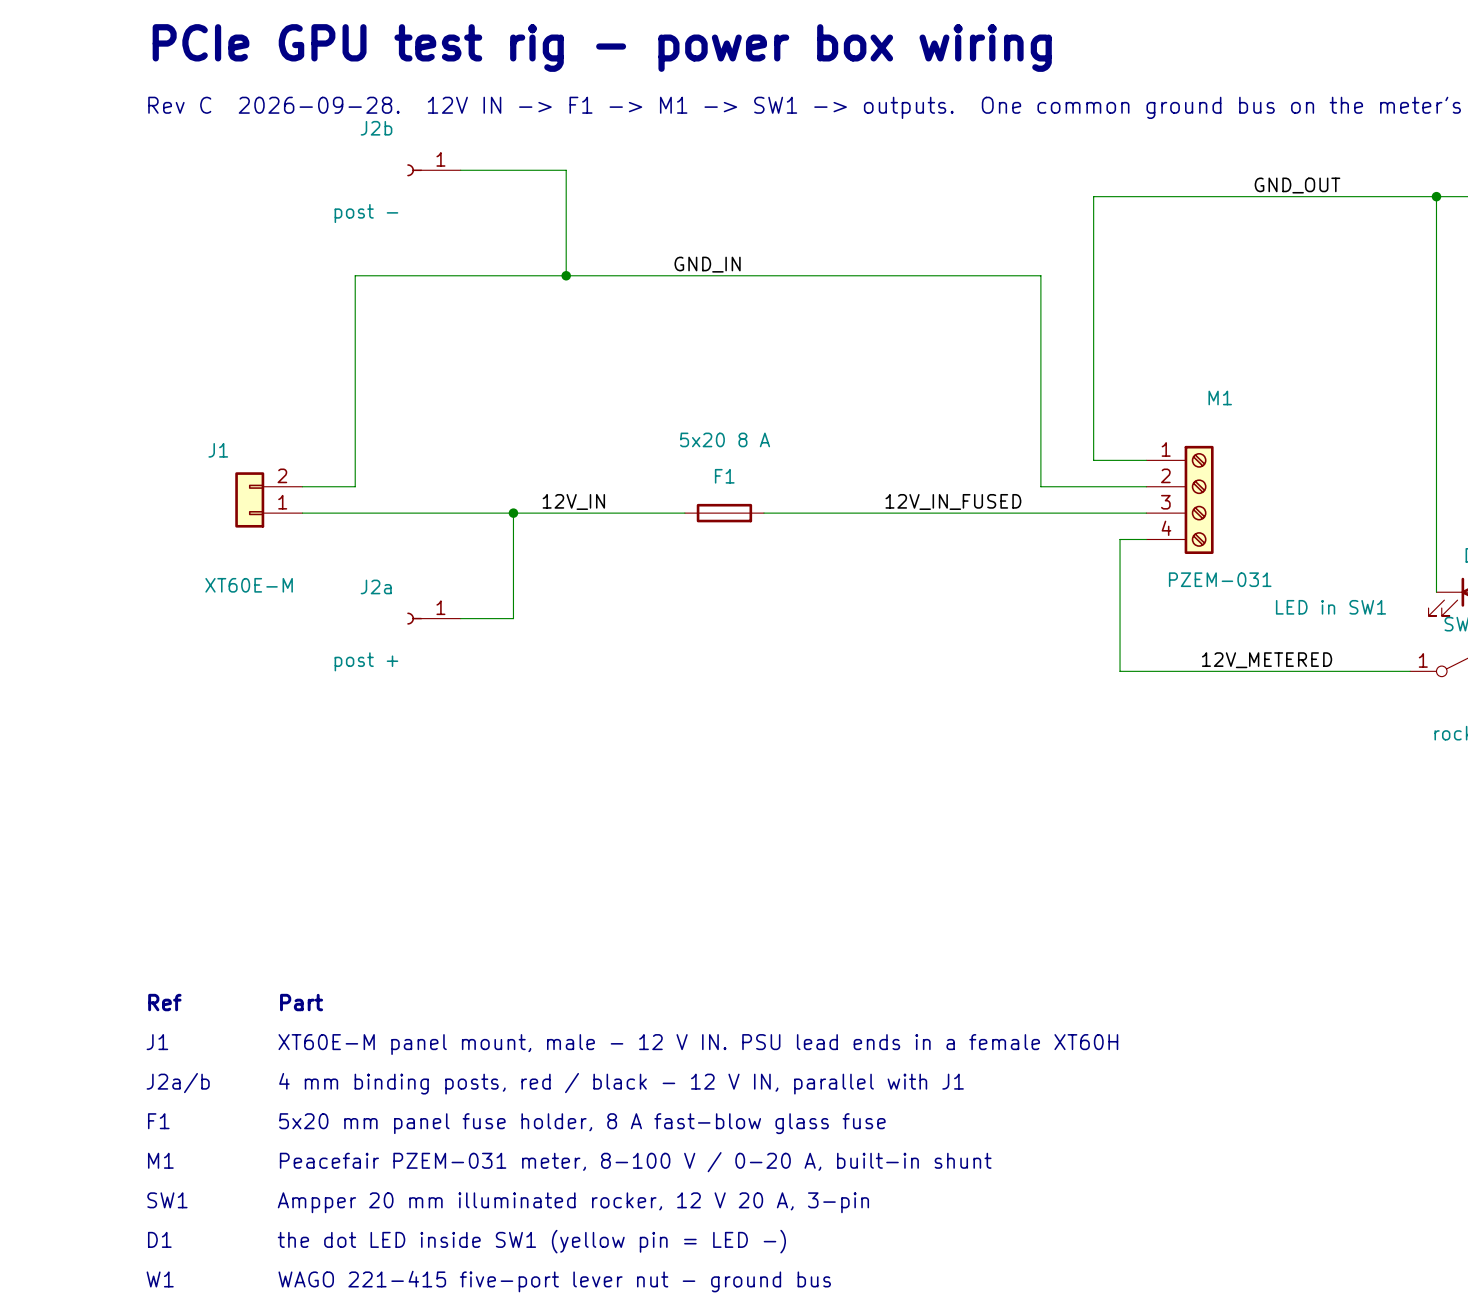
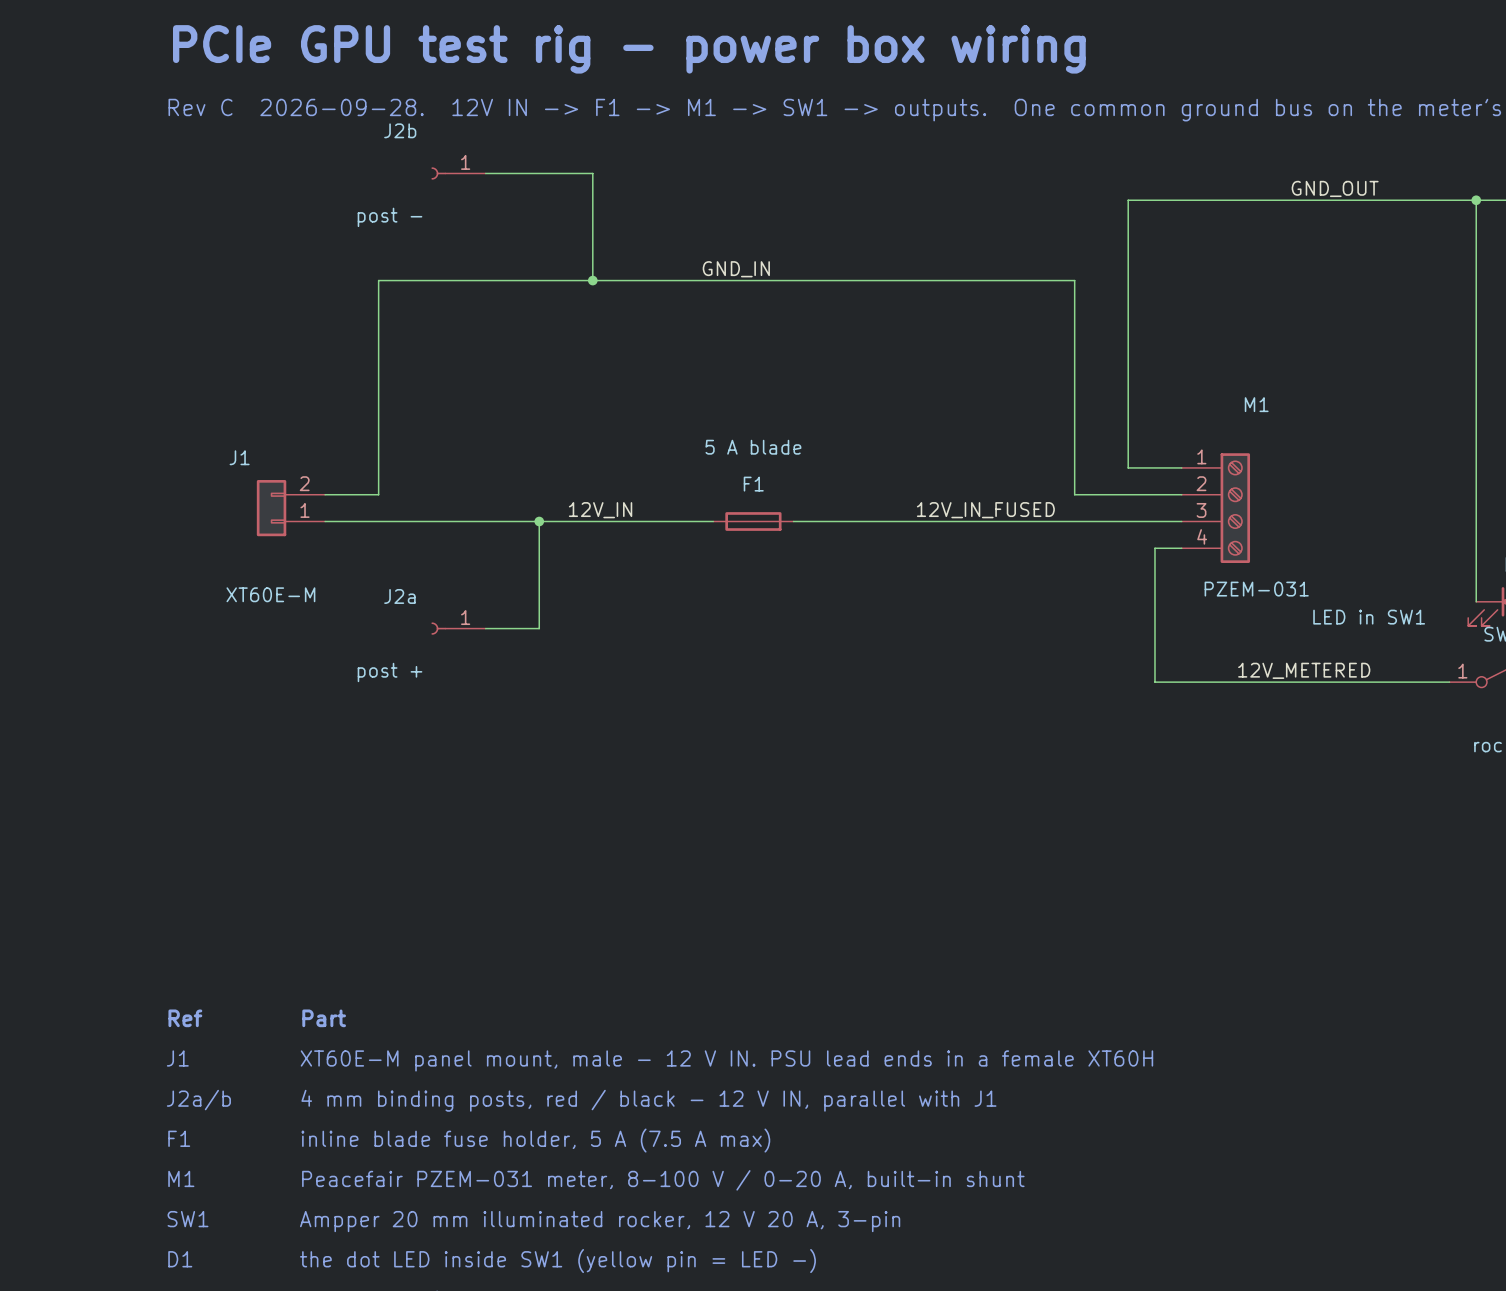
F1 value: 5x20 8 A (725, 439) -> 5 A blade (753, 447)
text: 5x20 mm panel fuse holder, 8 A fast-blow glass fuse (582, 1123) -> inline blade fuse holder, 5 A (7.5 A max) (535, 1140)

